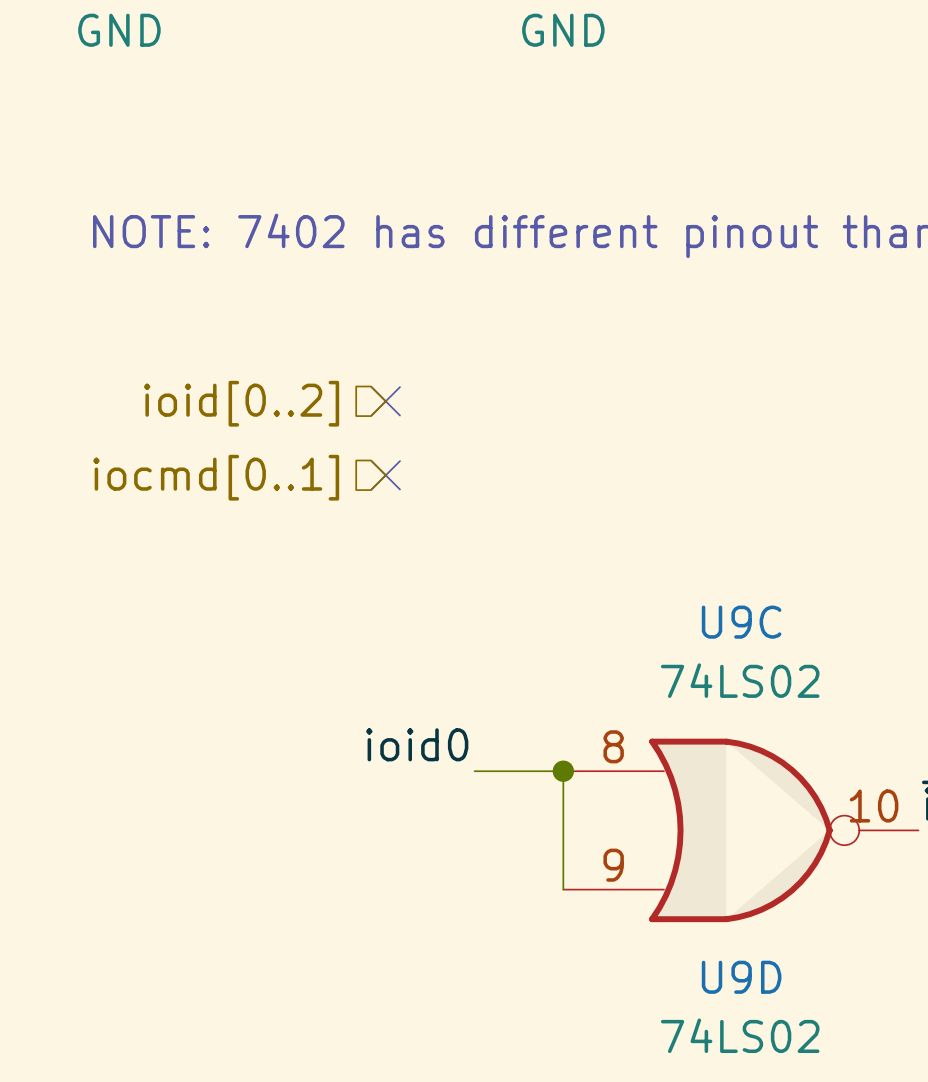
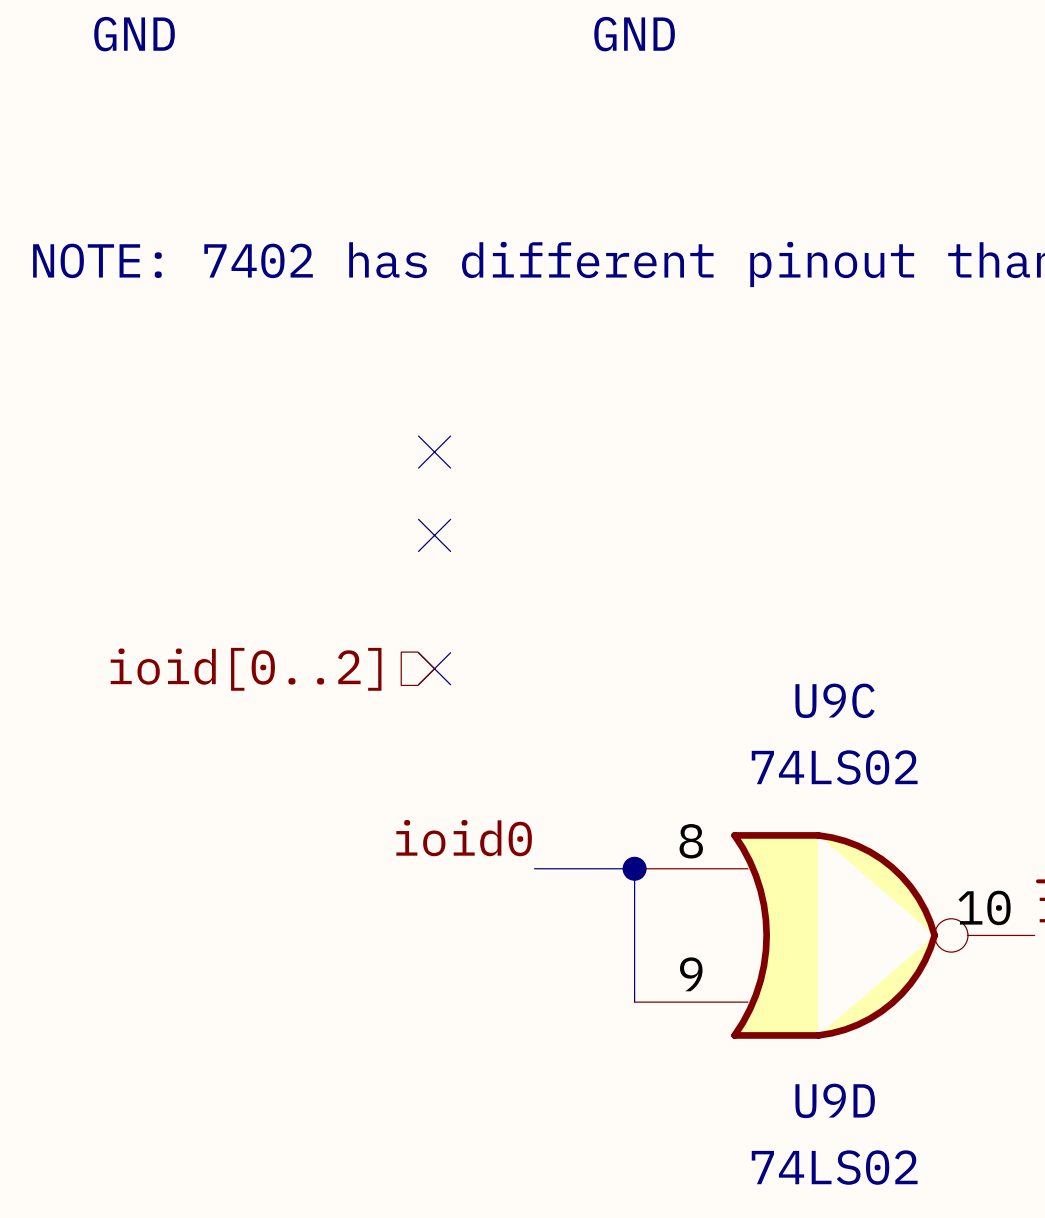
hierarchical label position: ioid[0..2] (241, 403) -> ioid[0..2] (246, 669)
hierarchical label: iocmd[0..1] (216, 477) -> none
no-connect mark: none -> (434, 668)

